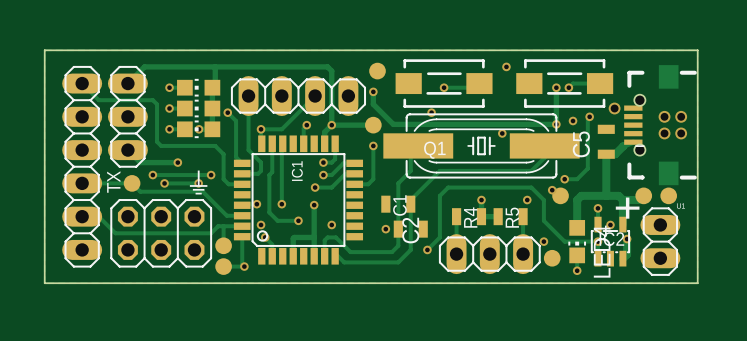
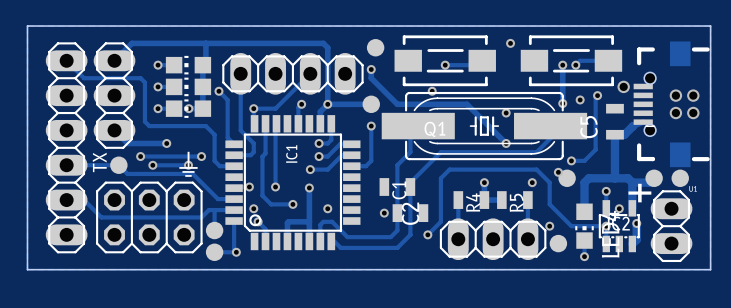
track: (373, 100) (373, 104) (393, 124) (556, 124) -> (371, 78) (397, 104) (467, 104) (506, 143)
via: none -> (506, 143)

